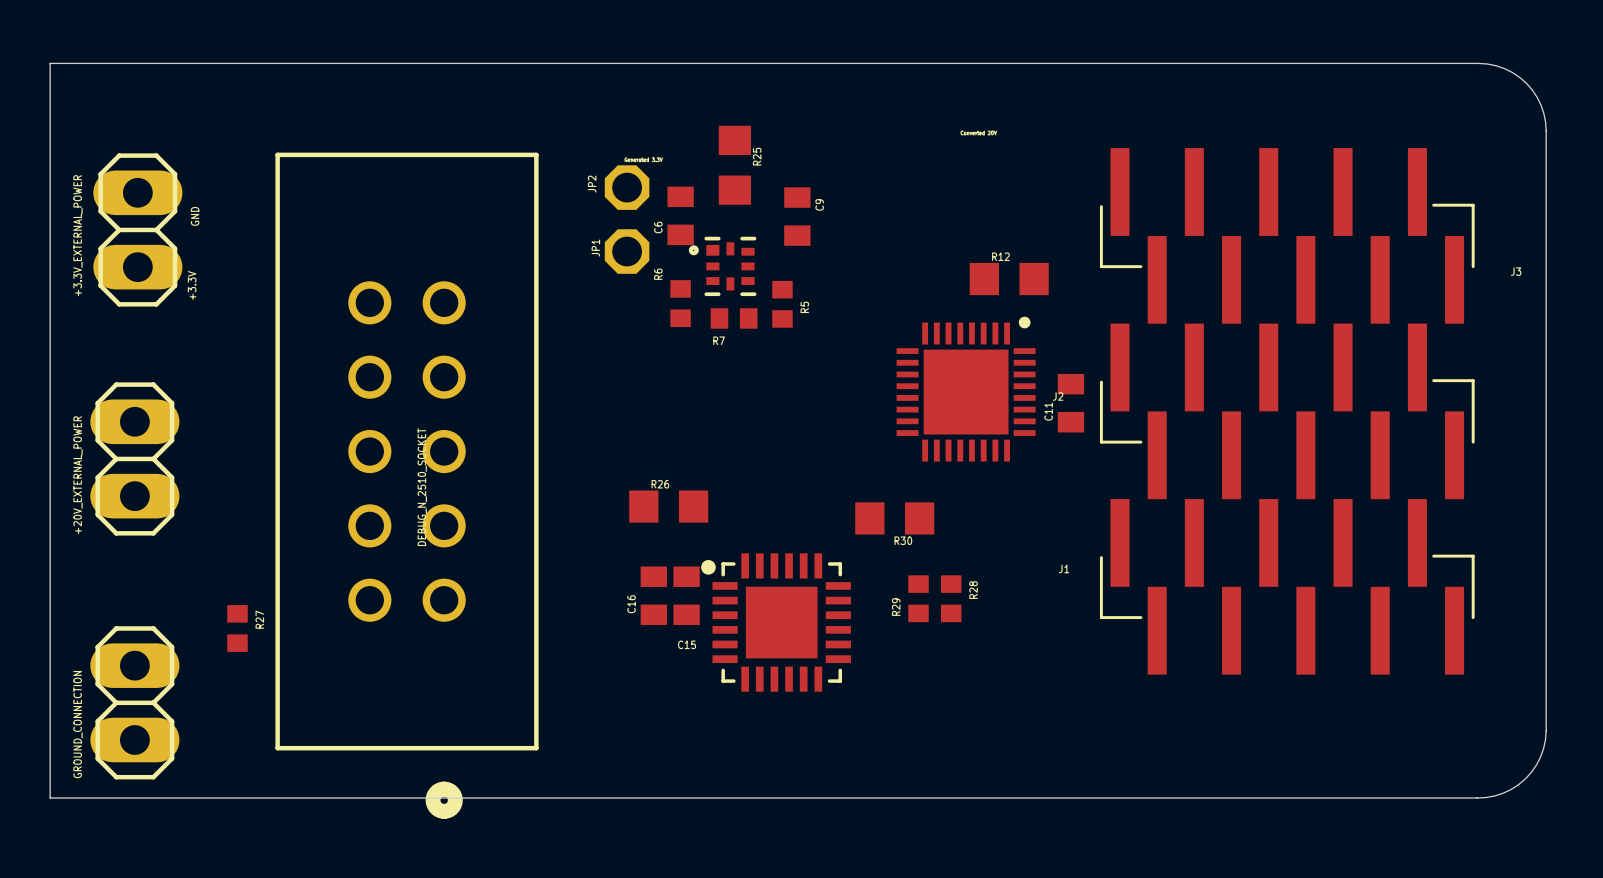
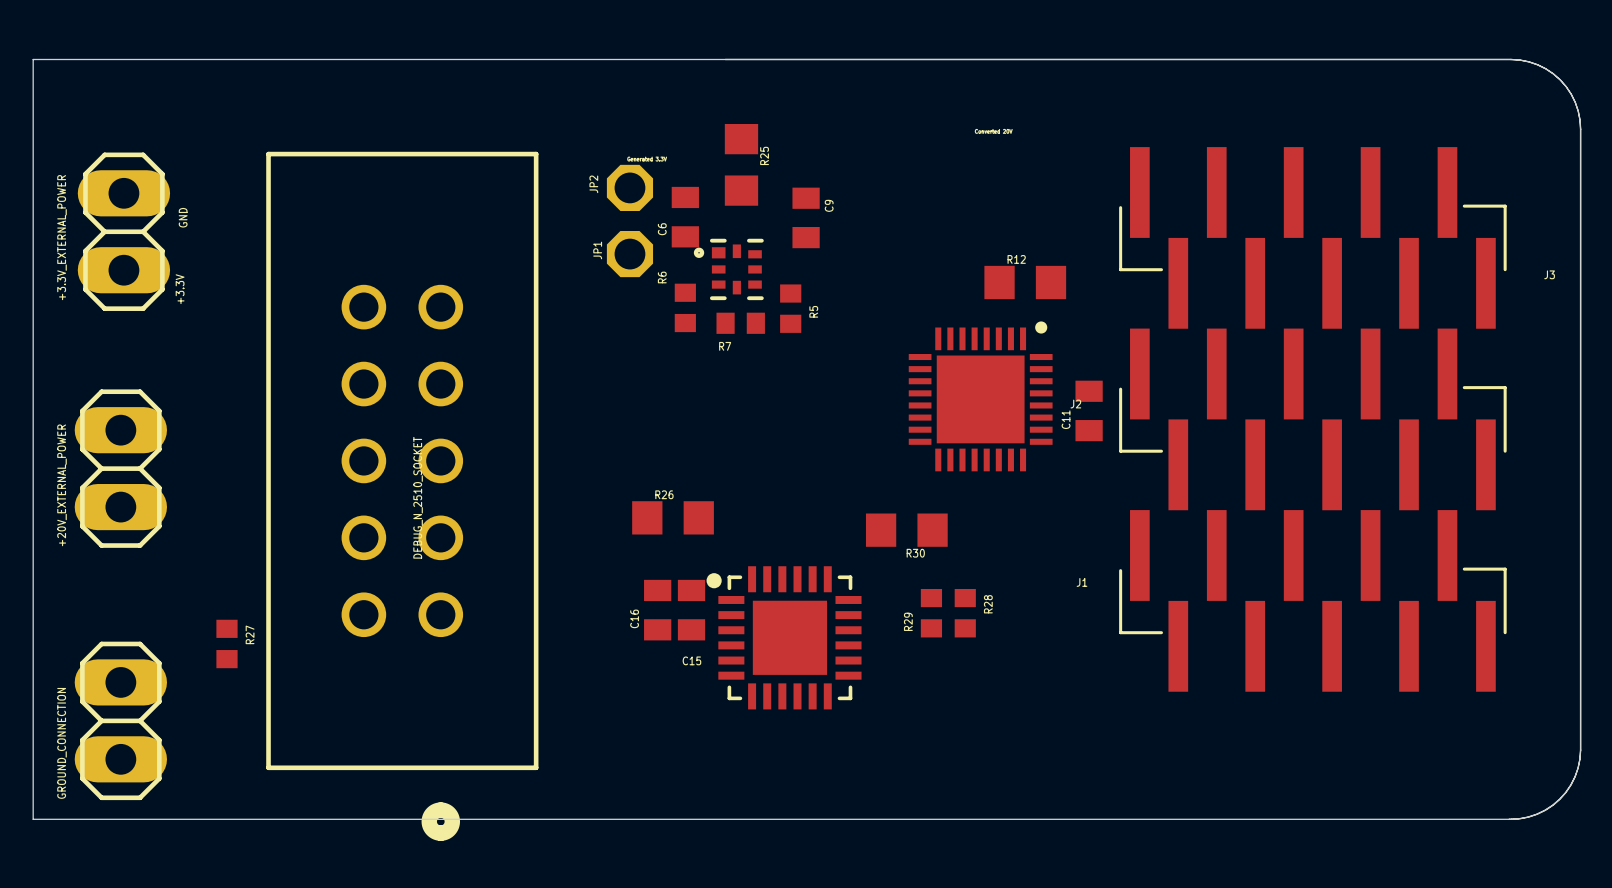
board edge: none -> (725, 59) (1511, 59) (1537, 64) (1560, 79) (1575, 102) (1580, 128) (1579, 759) (1571, 784) (1553, 805) (1529, 816) (1509, 819)

